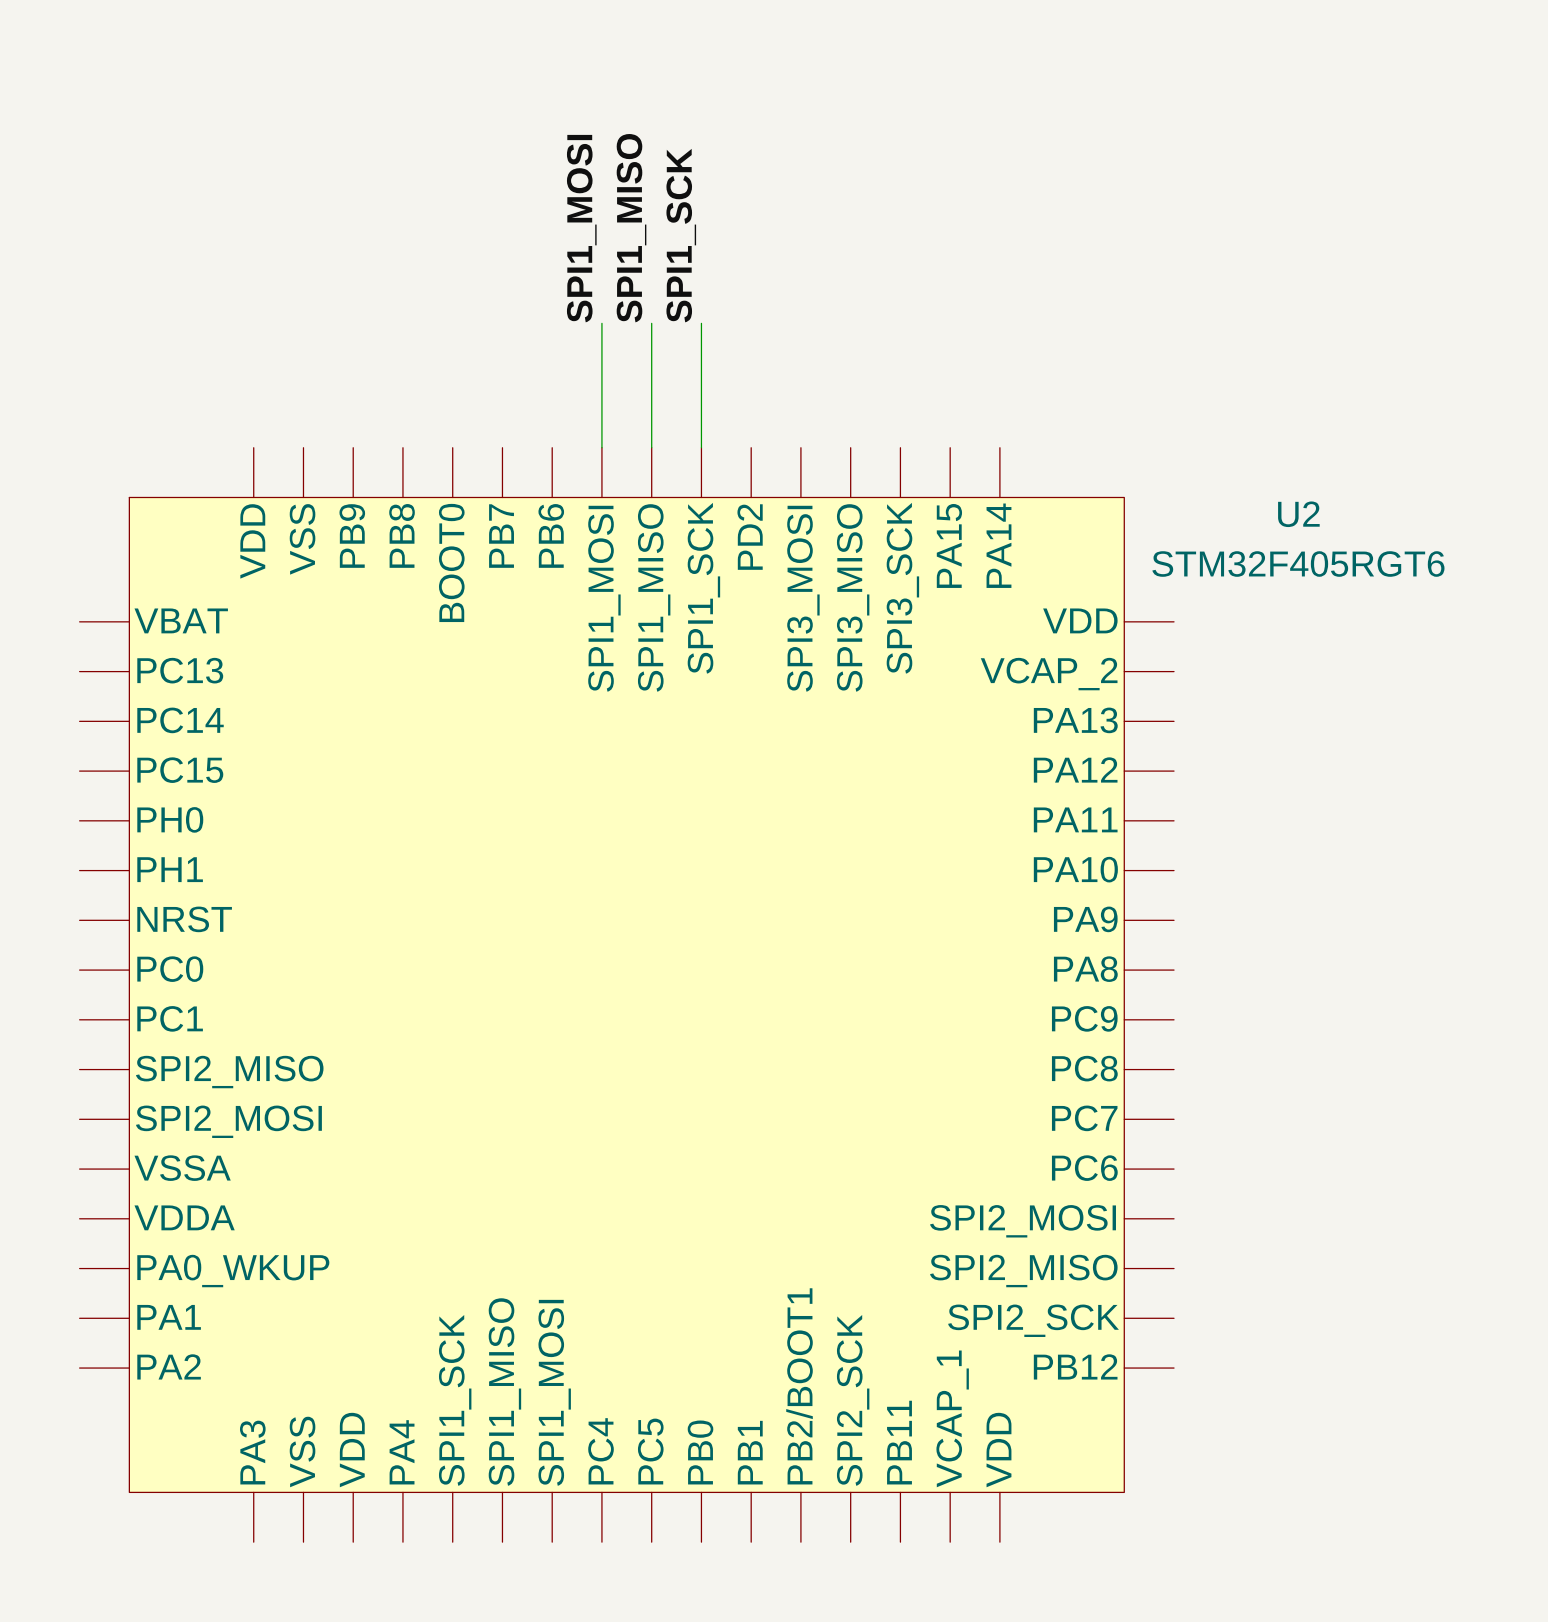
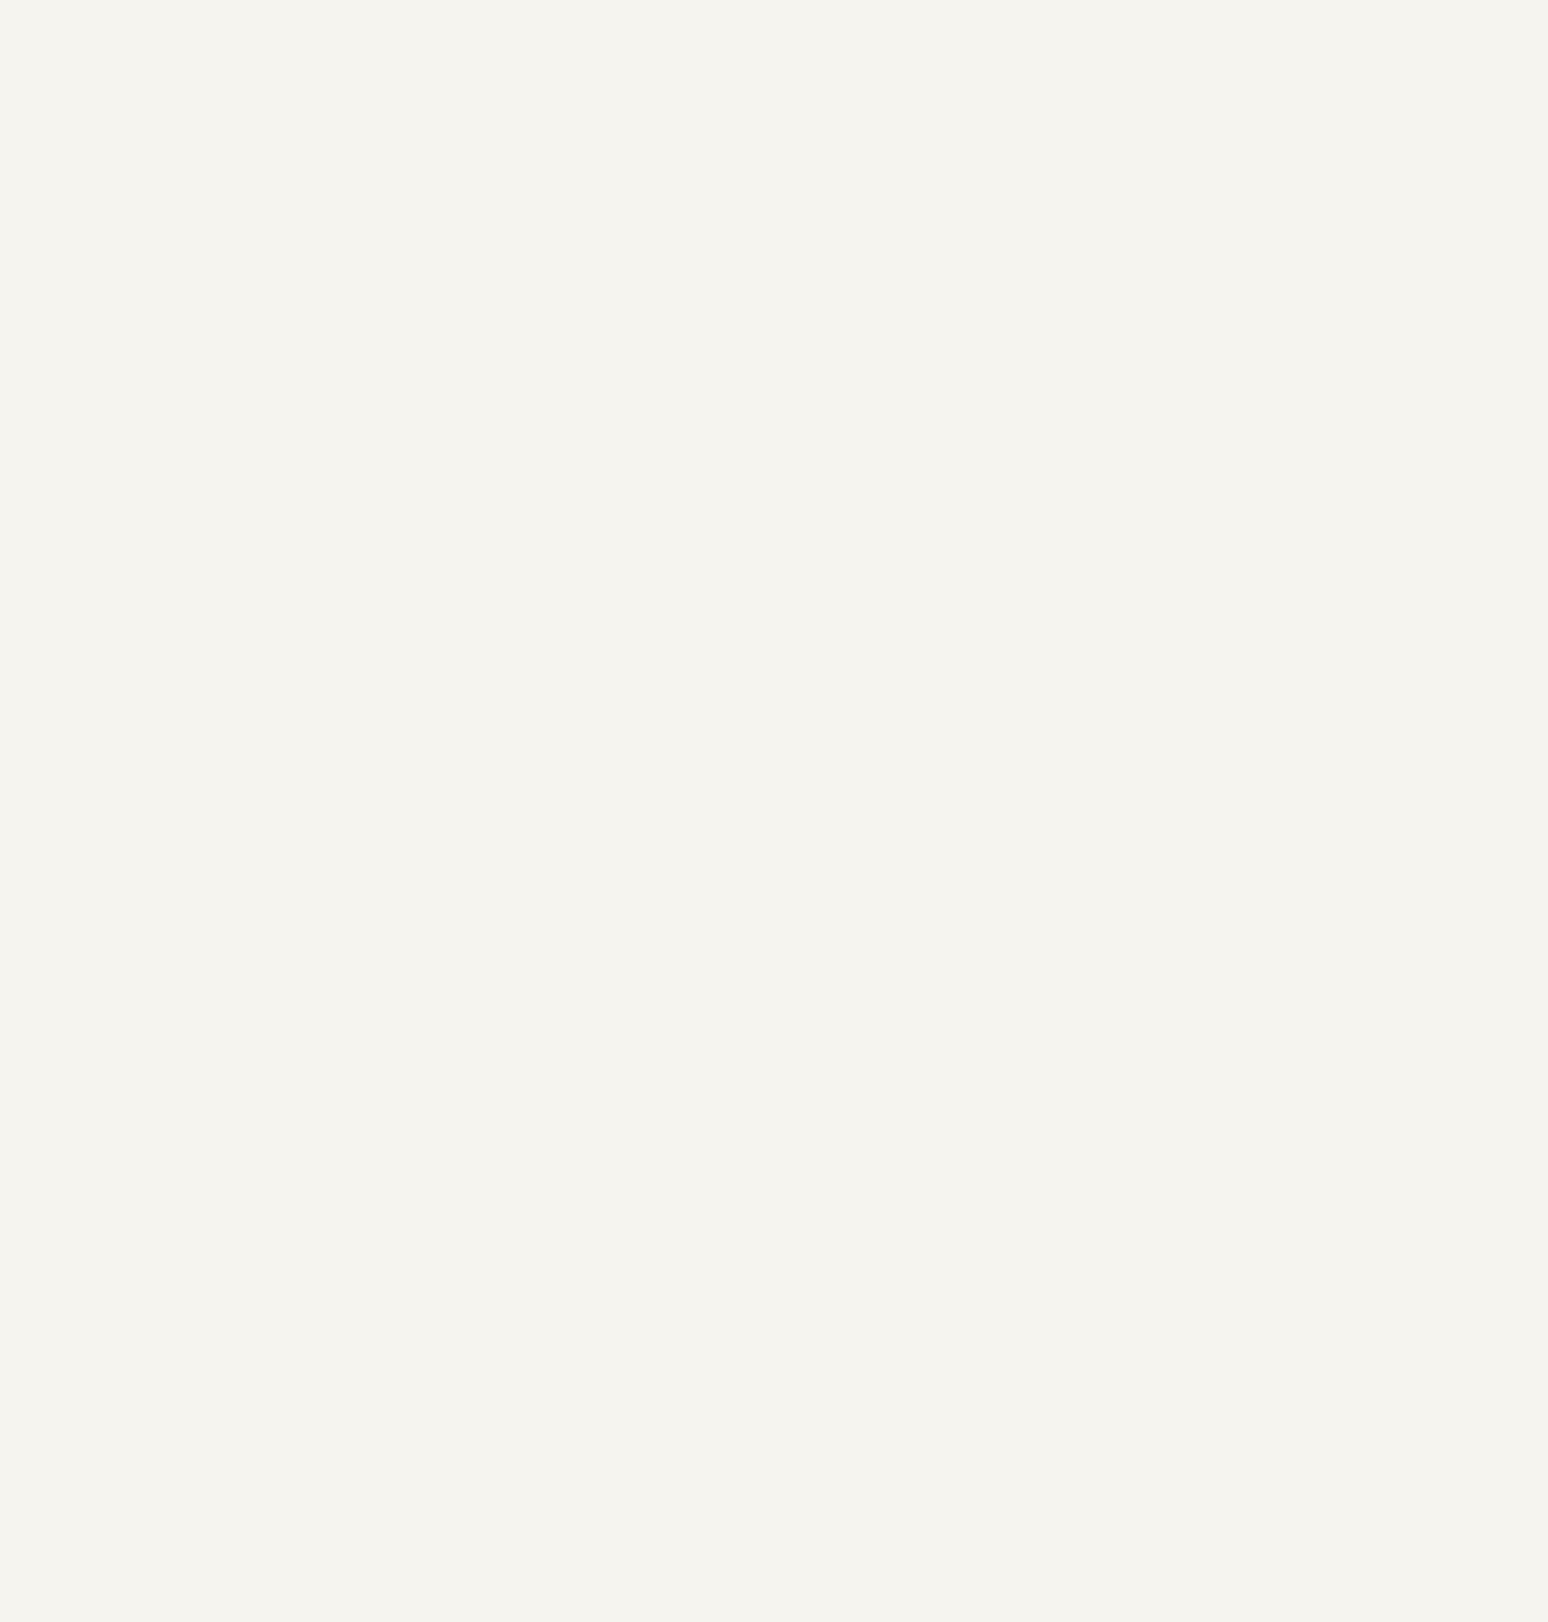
label: SPI1_MOSI (581, 228) -> none
label: SPI1_MISO (631, 228) -> none
label: SPI1_SCK (681, 235) -> none
wire: (601, 323) (601, 447) -> none
wire: (651, 323) (651, 447) -> none
wire: (701, 323) (701, 447) -> none
U2: STM32F405RGT6 (626, 994) -> none

